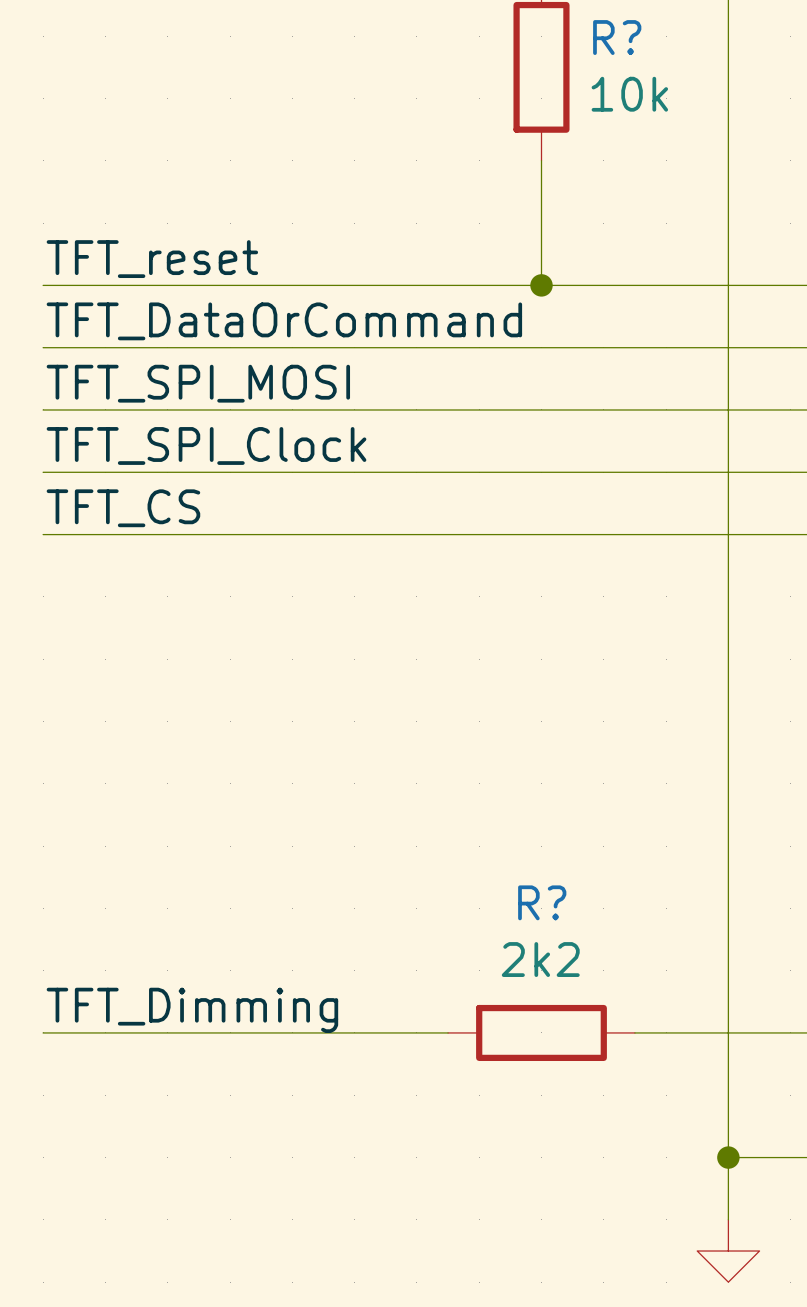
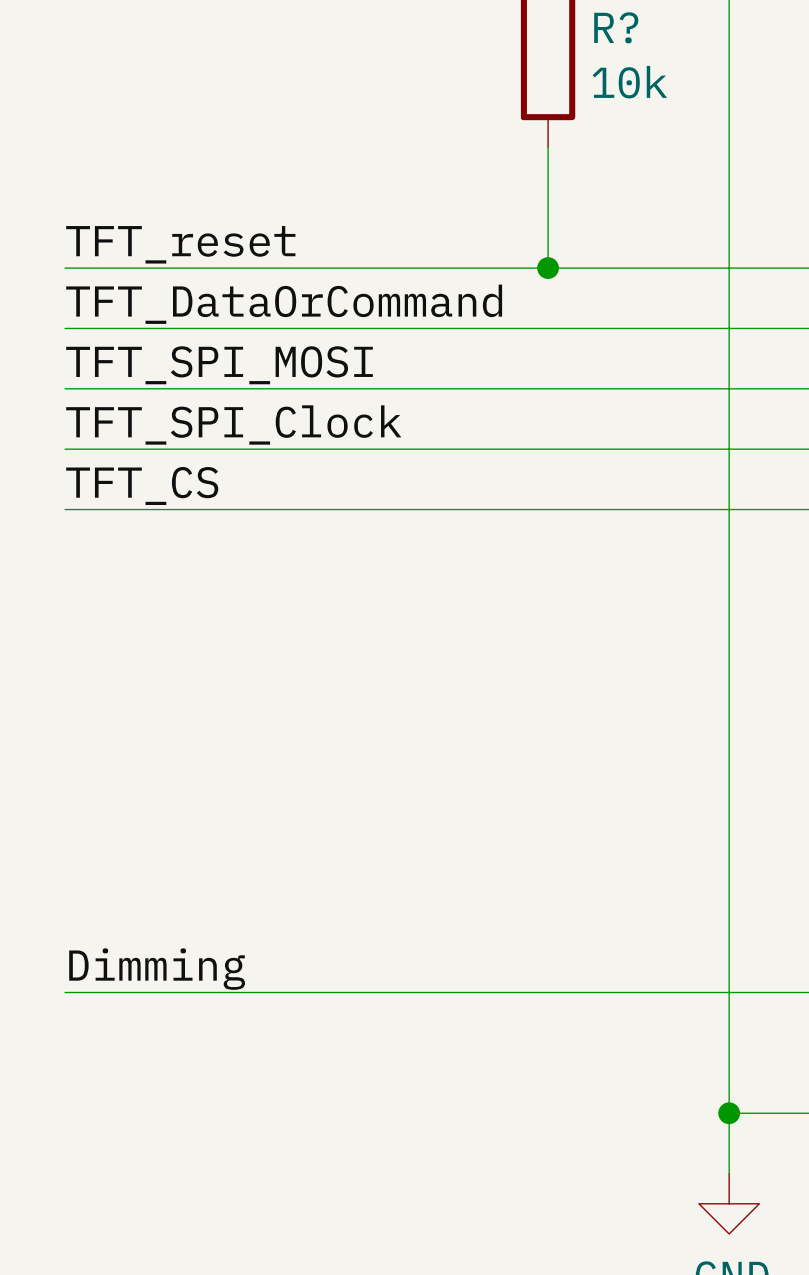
label: TFT_Dimming (192, 1010) -> Dimming (157, 969)
wire: none -> (457, 992) (638, 992)
R?: 2k2 (541, 1032) -> none

